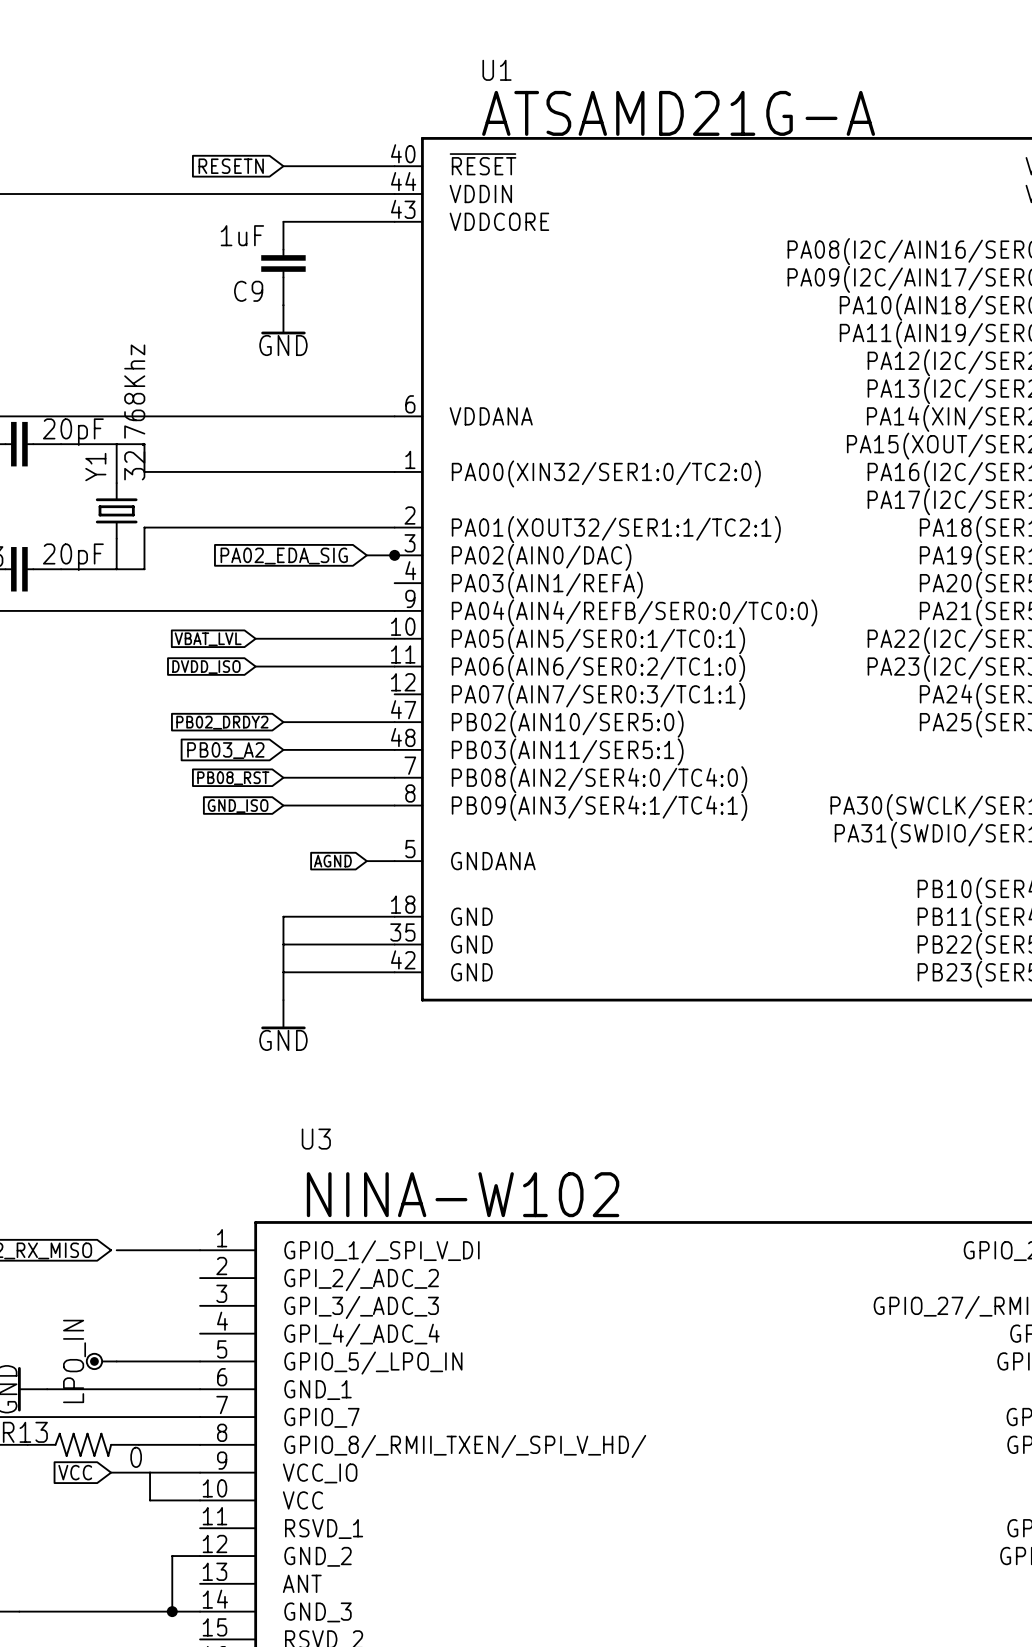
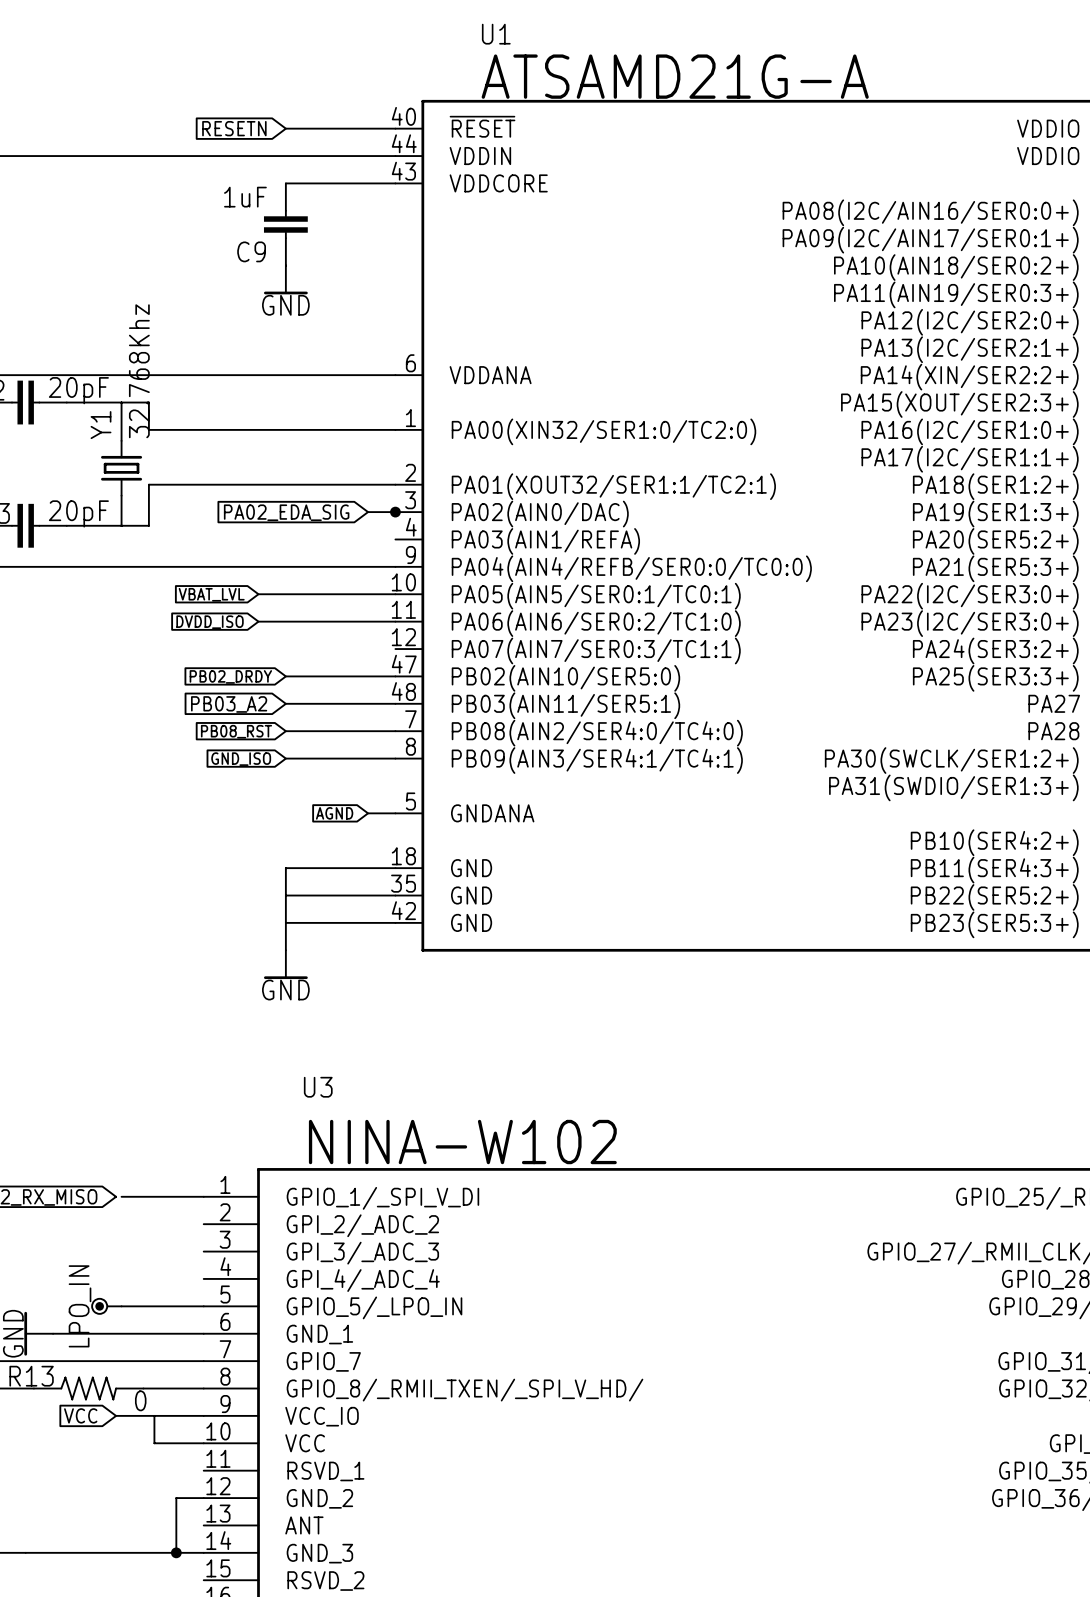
global label: PB02_DRDY2 (222, 722) -> PB02_DRDY (230, 676)

